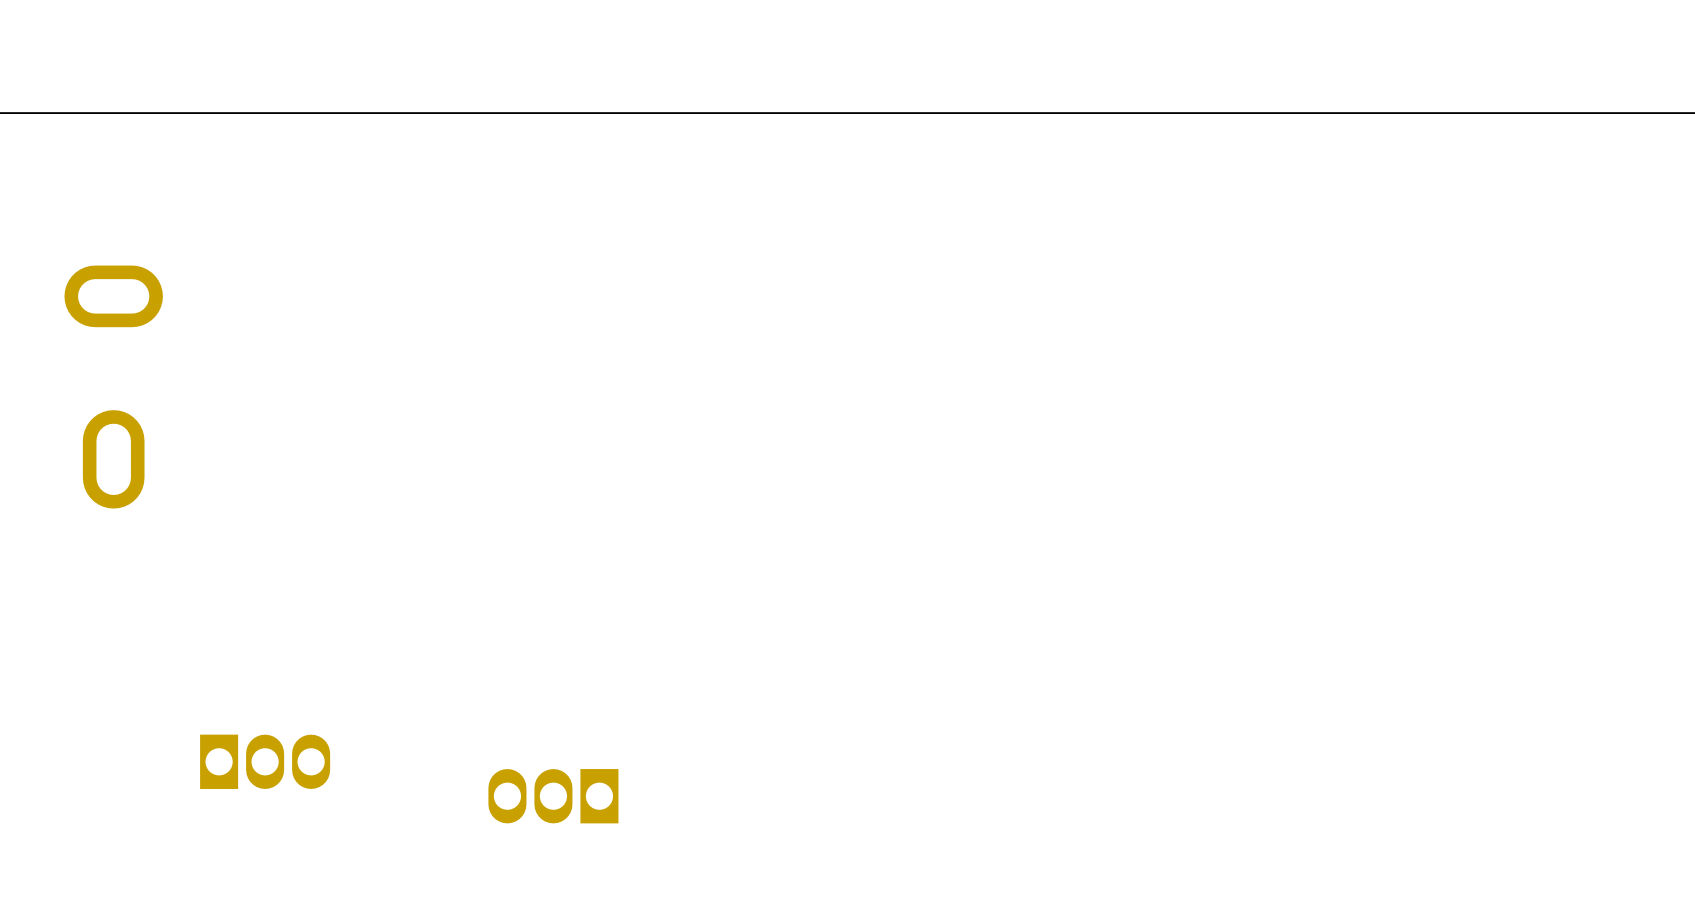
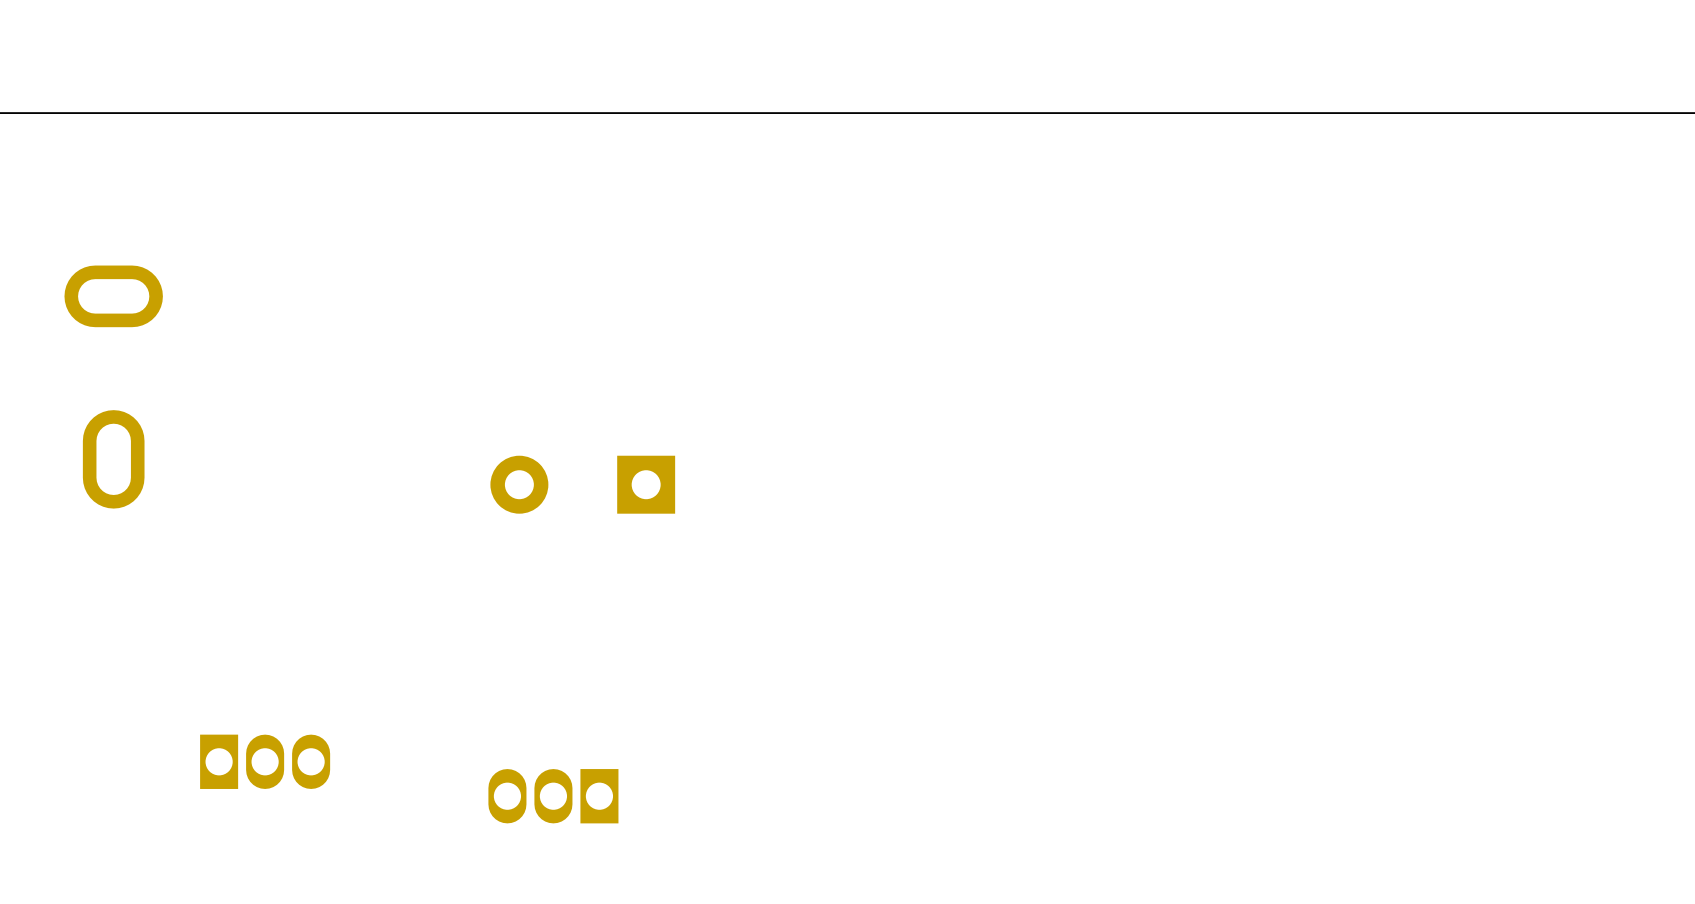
part: none -> (582, 484)

